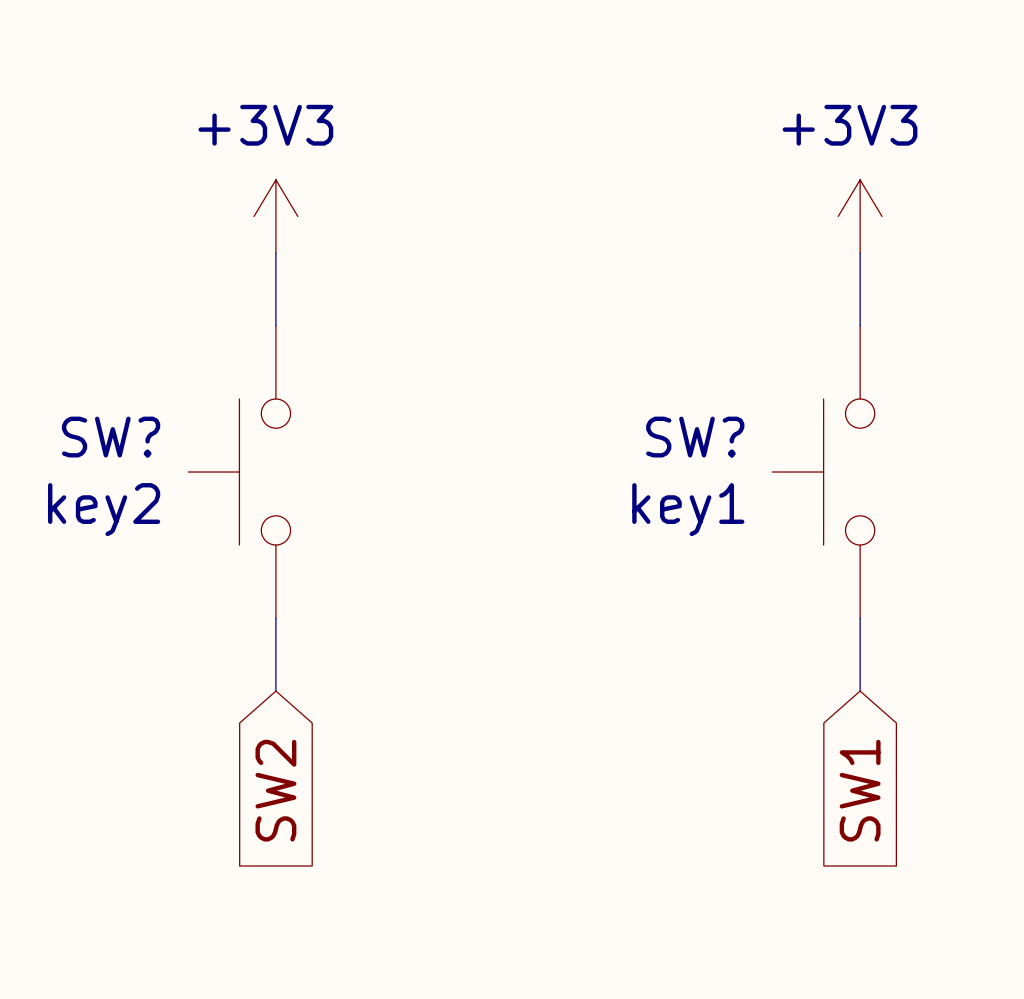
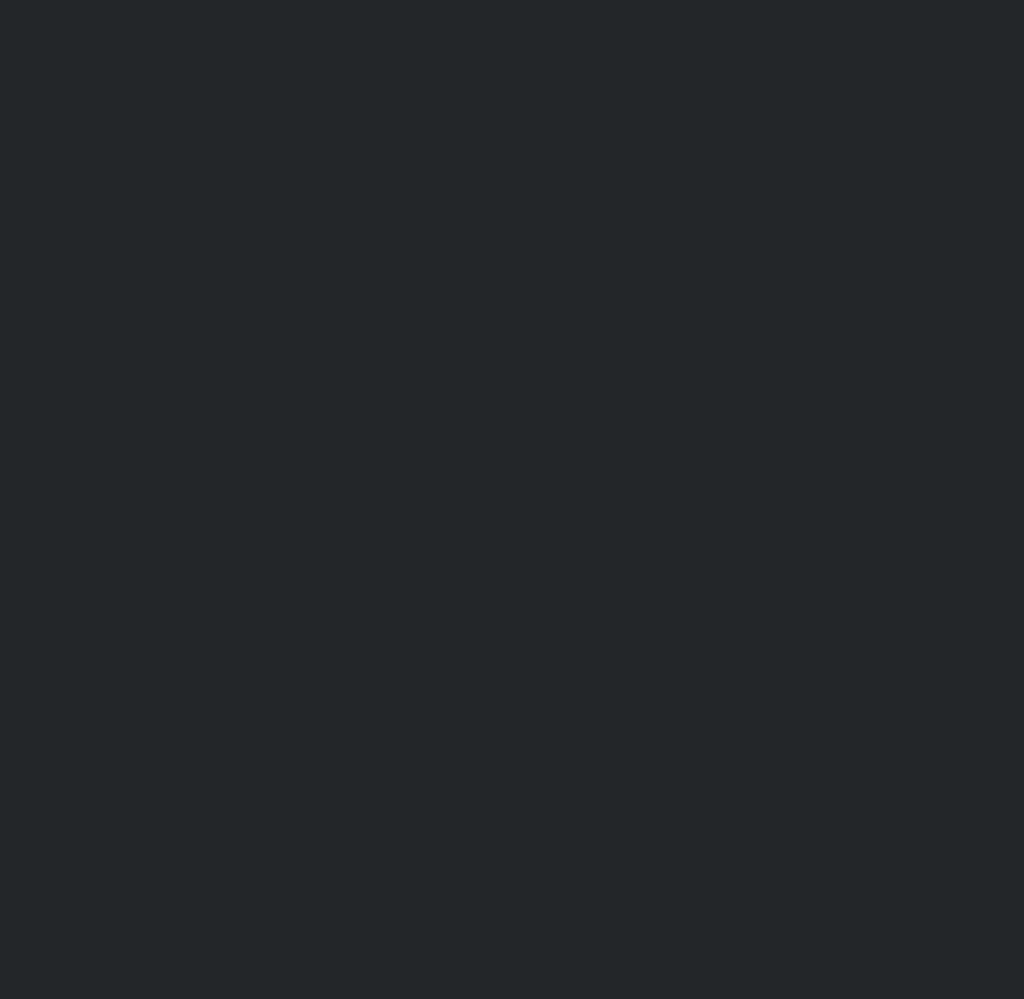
power symbol: +3V3 (275, 216) -> none
power symbol: +3V3 (860, 216) -> none
wire: (275, 252) (275, 325) -> none
wire: (860, 252) (860, 325) -> none
SW?: key2 (239, 472) -> none
SW?: key1 (823, 472) -> none
wire: (275, 618) (275, 691) -> none
wire: (860, 618) (860, 691) -> none
global label: SW2 (275, 790) -> none
global label: SW1 (860, 790) -> none

